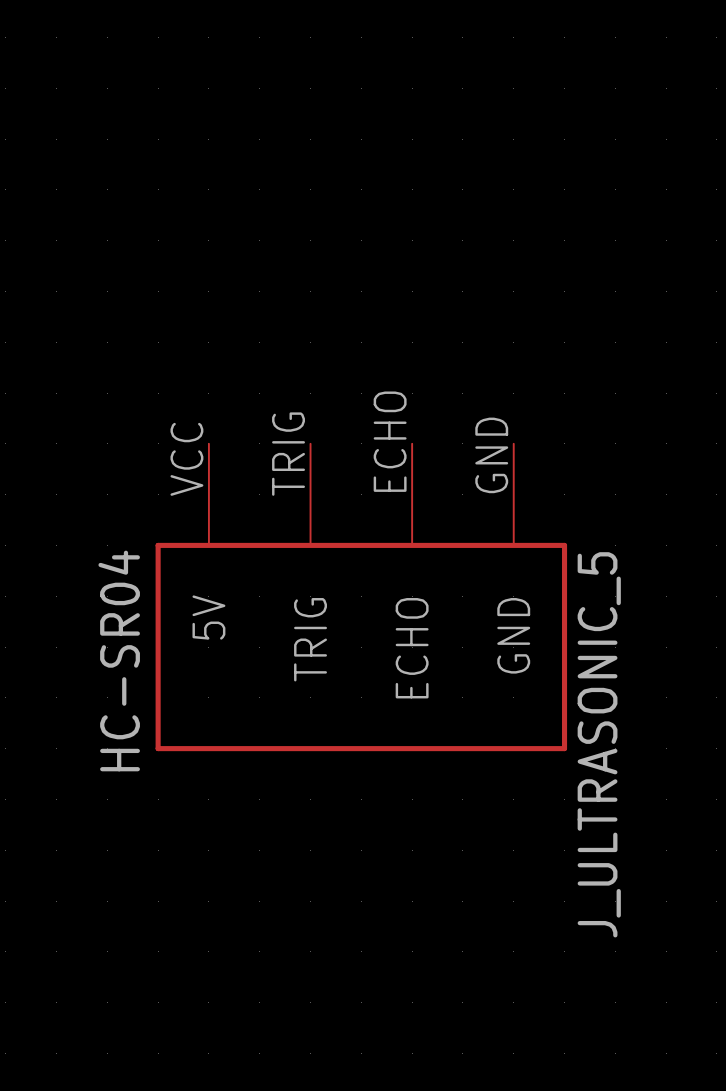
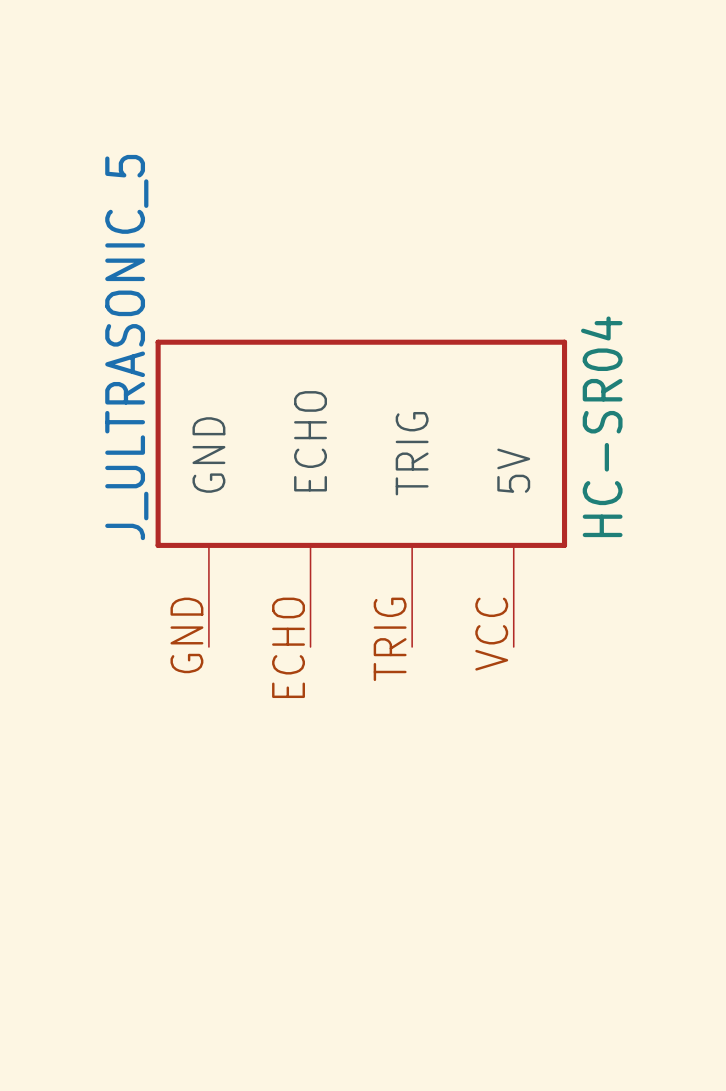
J_ULTRASONIC_5 rotation: 0° (361, 647) -> 180° (361, 443)

